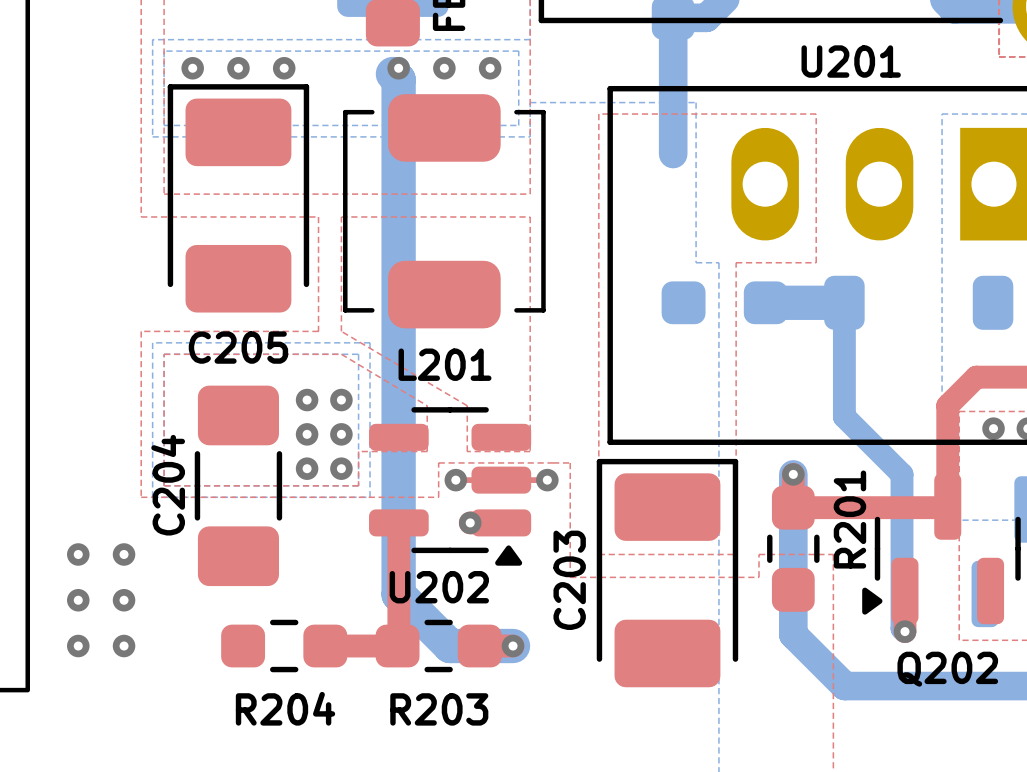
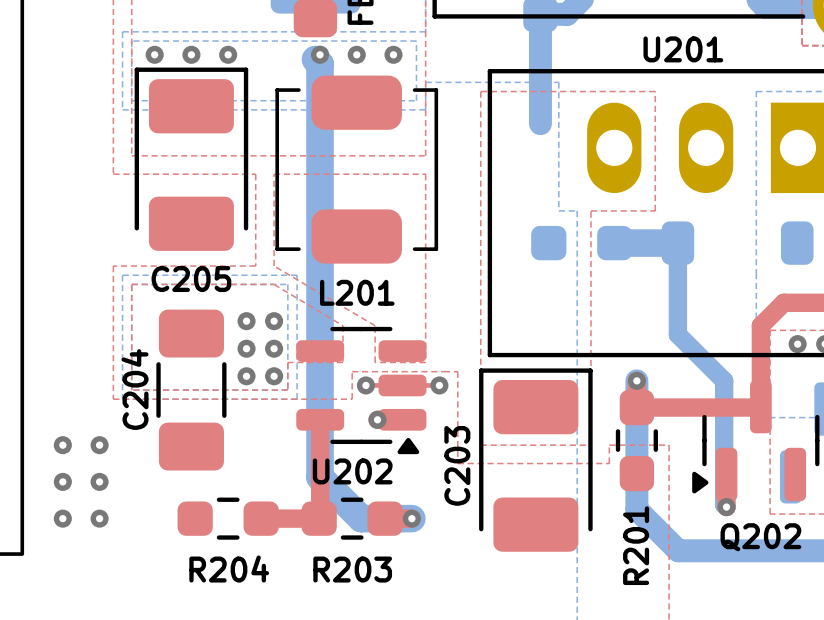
R201 name position: R201 (849, 519) -> R201 (636, 545)

